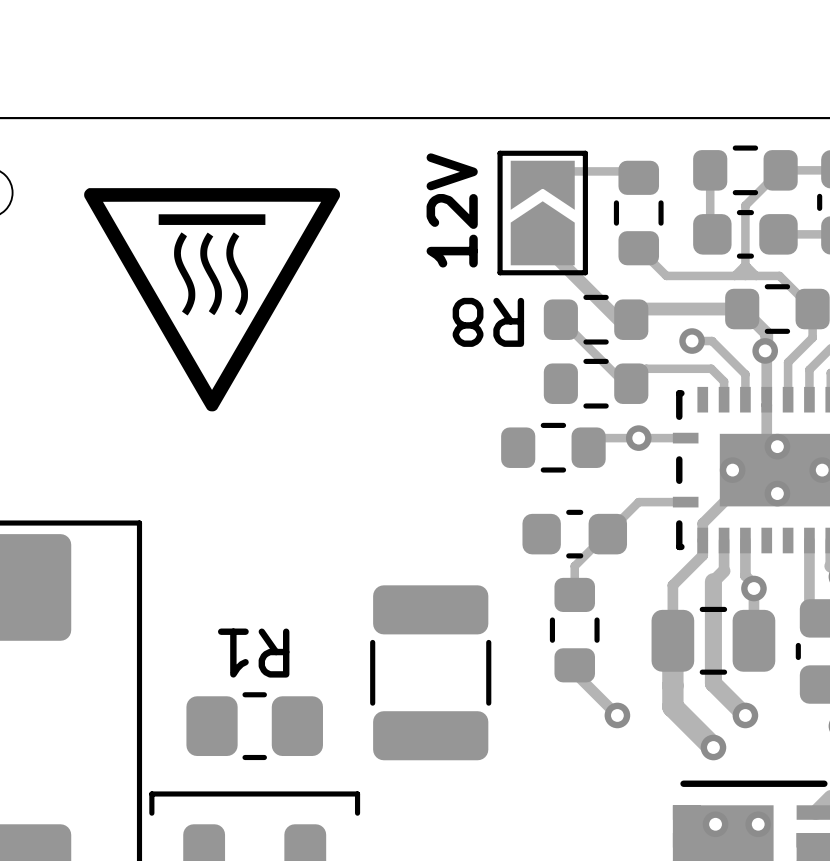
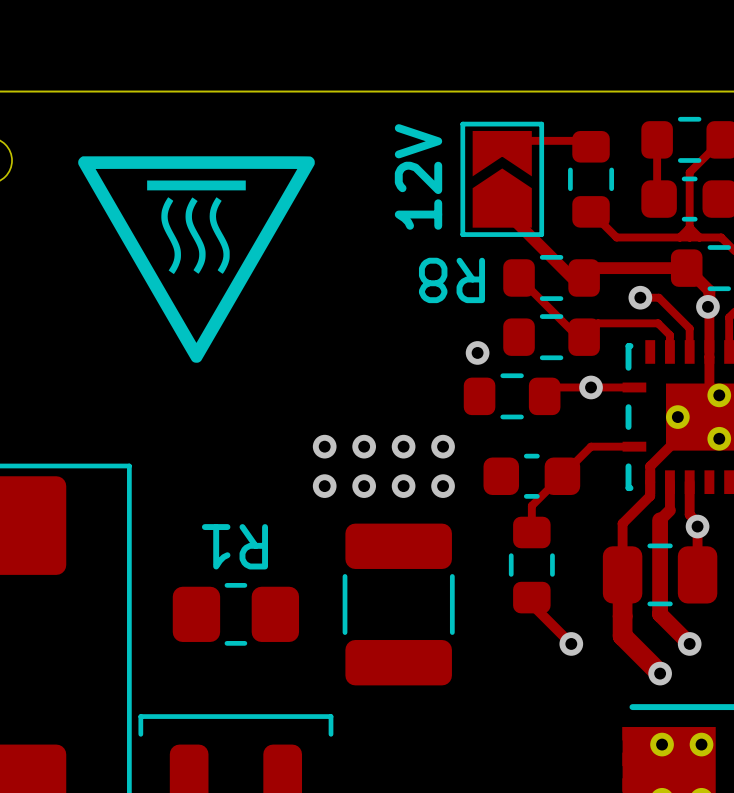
via: none -> (477, 352)
via: none -> (324, 446)
via: none -> (364, 446)
via: none -> (403, 446)
via: none -> (443, 446)
via: none -> (324, 486)
via: none -> (364, 486)
via: none -> (403, 486)
via: none -> (443, 486)
R1 position: (254, 726) -> (235, 614)

